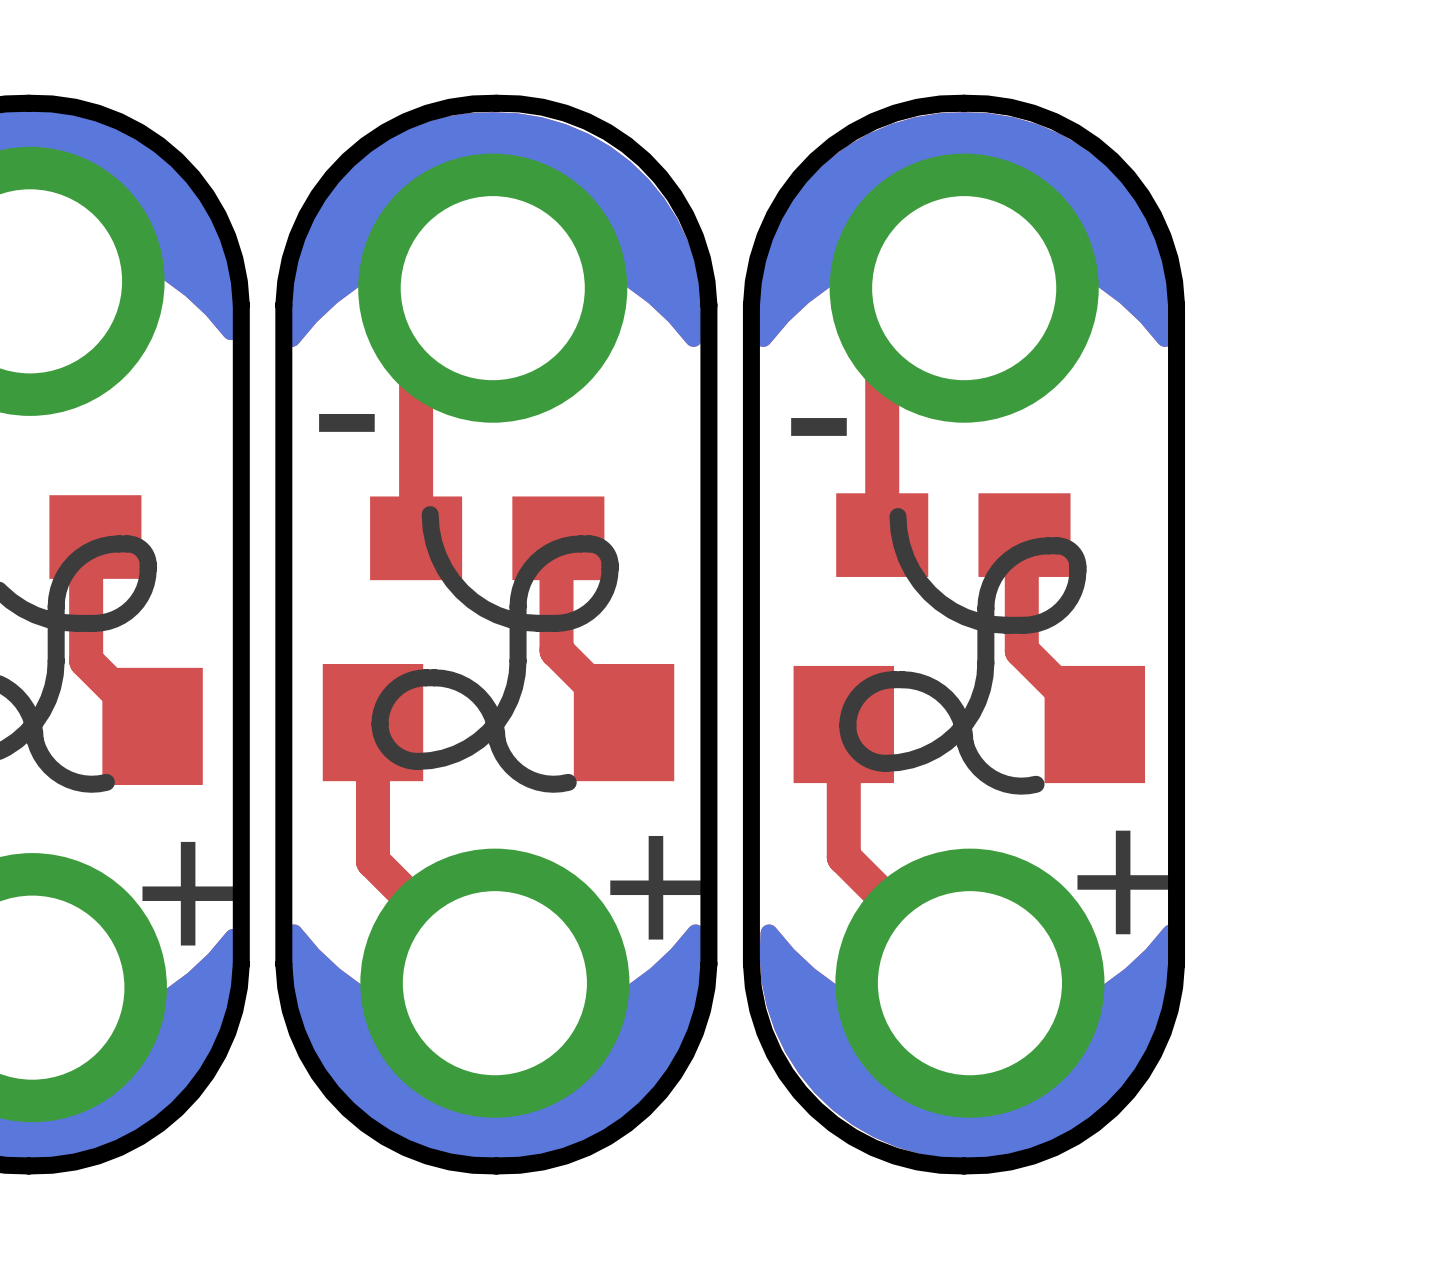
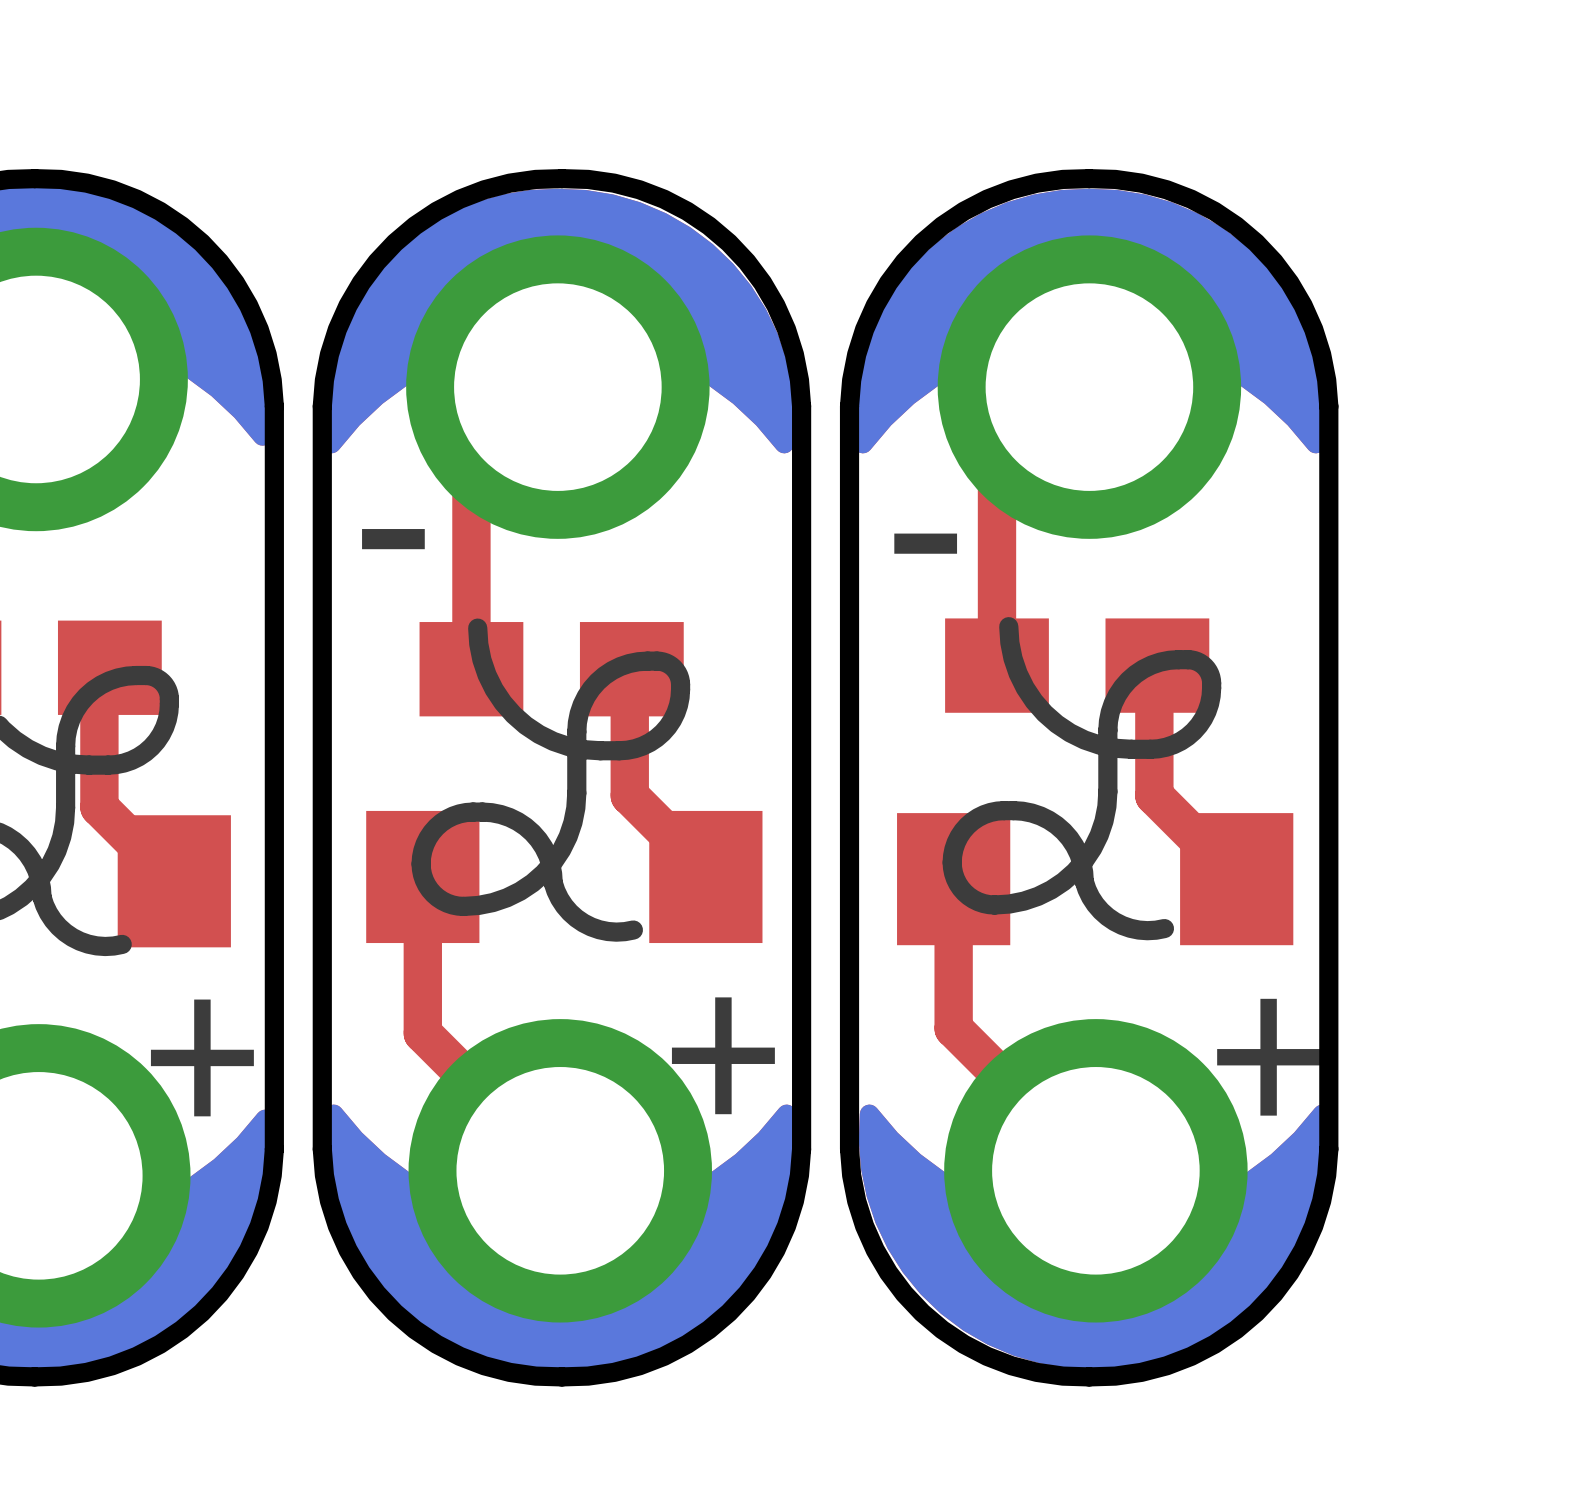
drawing position: (495, 649) -> (550, 780)
drawing position: (962, 651) -> (1081, 778)
text position: + (655, 887) -> + (723, 1055)
text position: + (188, 893) -> + (202, 1057)

